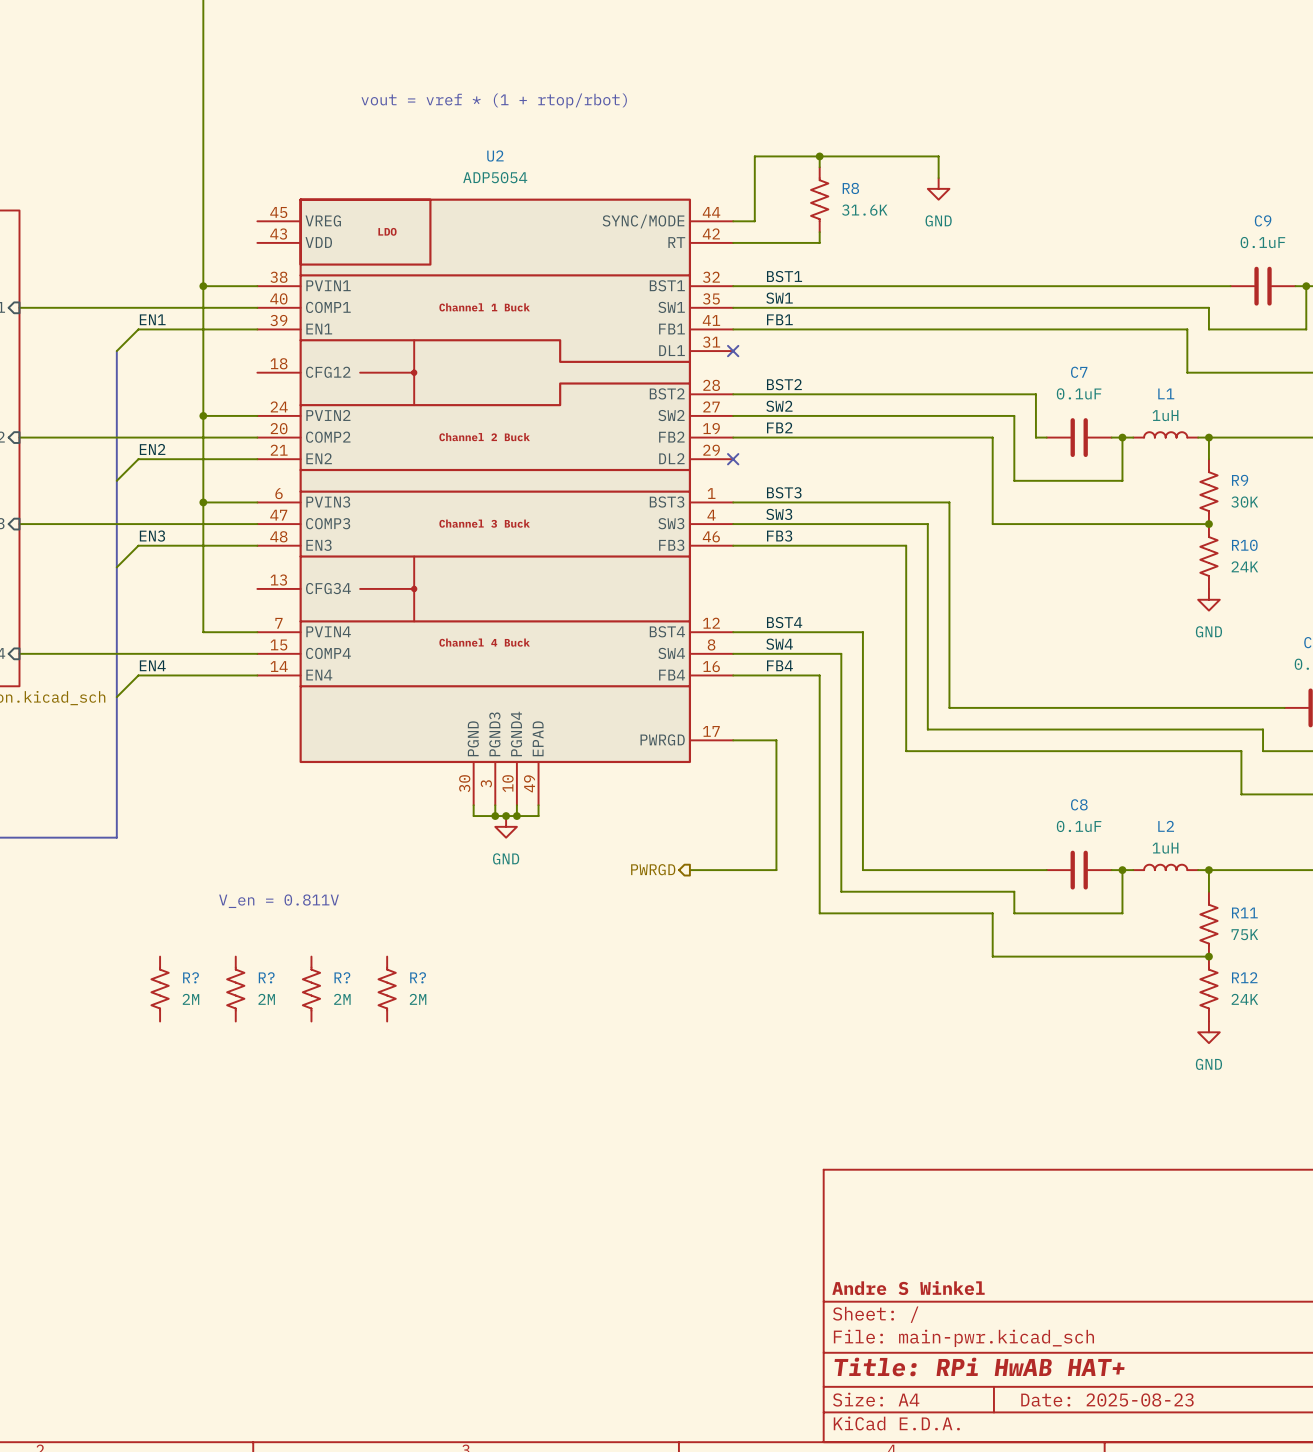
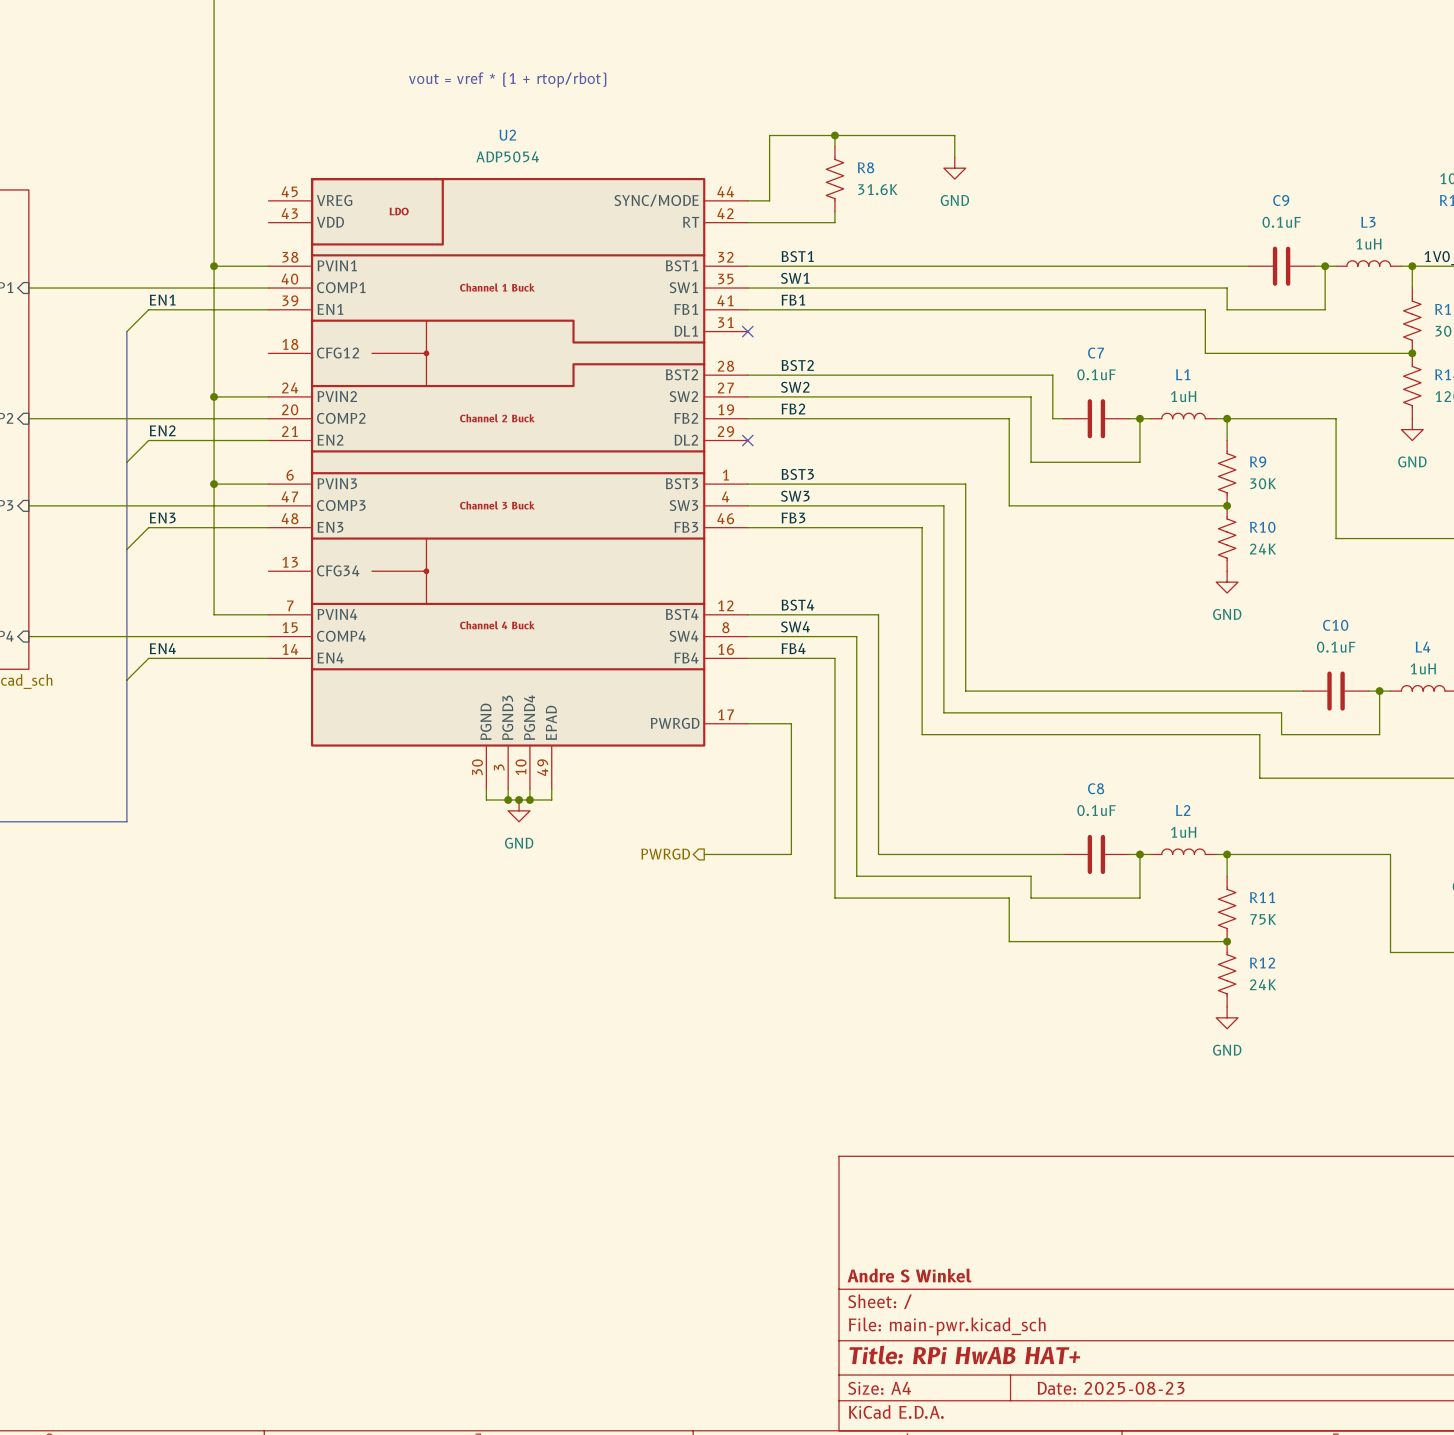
text: V_en = 0.811V (279, 901) -> none
R?: 2M (160, 989) -> none
R?: 2M (235, 989) -> none
R?: 2M (311, 989) -> none
R?: 2M (387, 989) -> none

